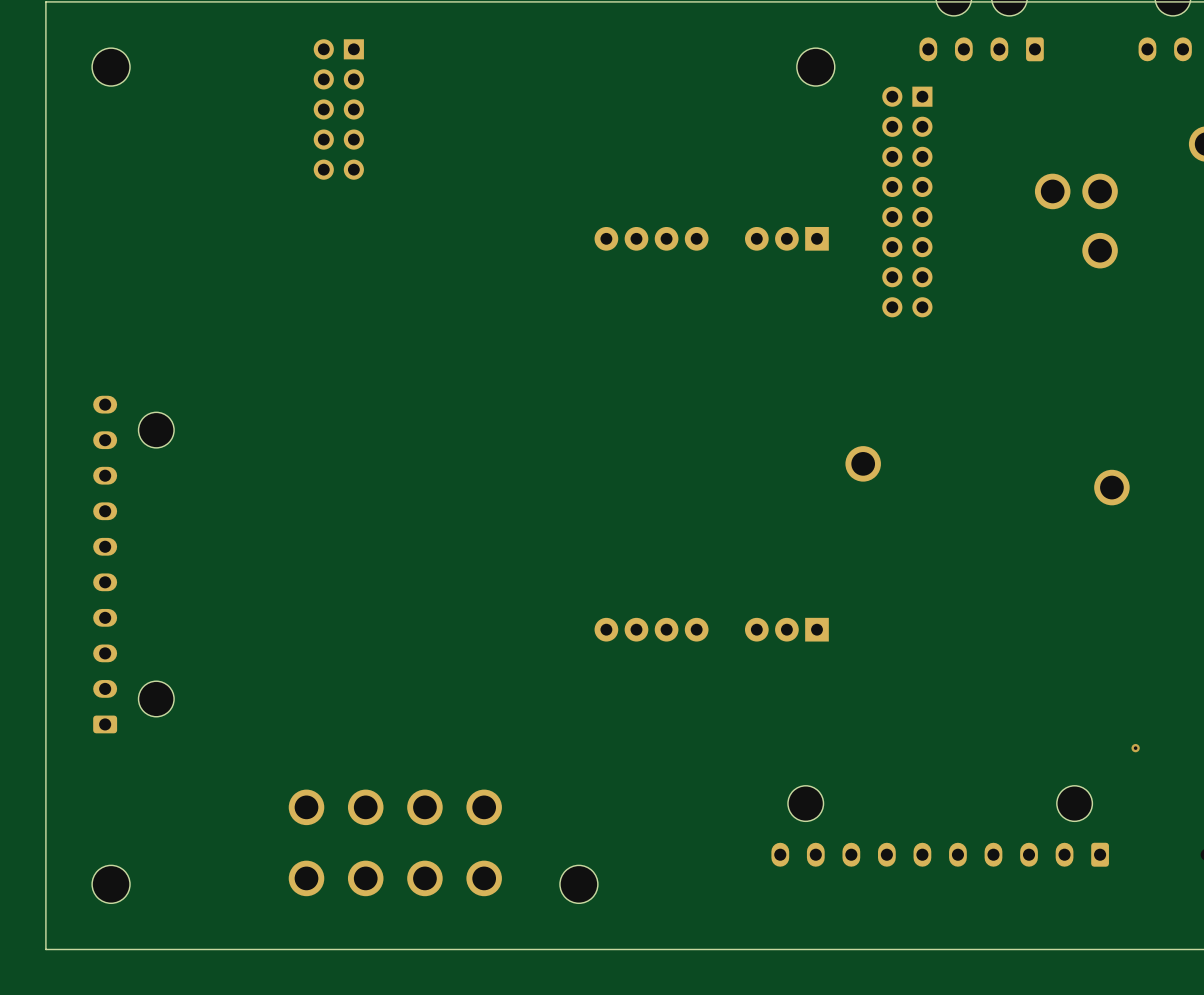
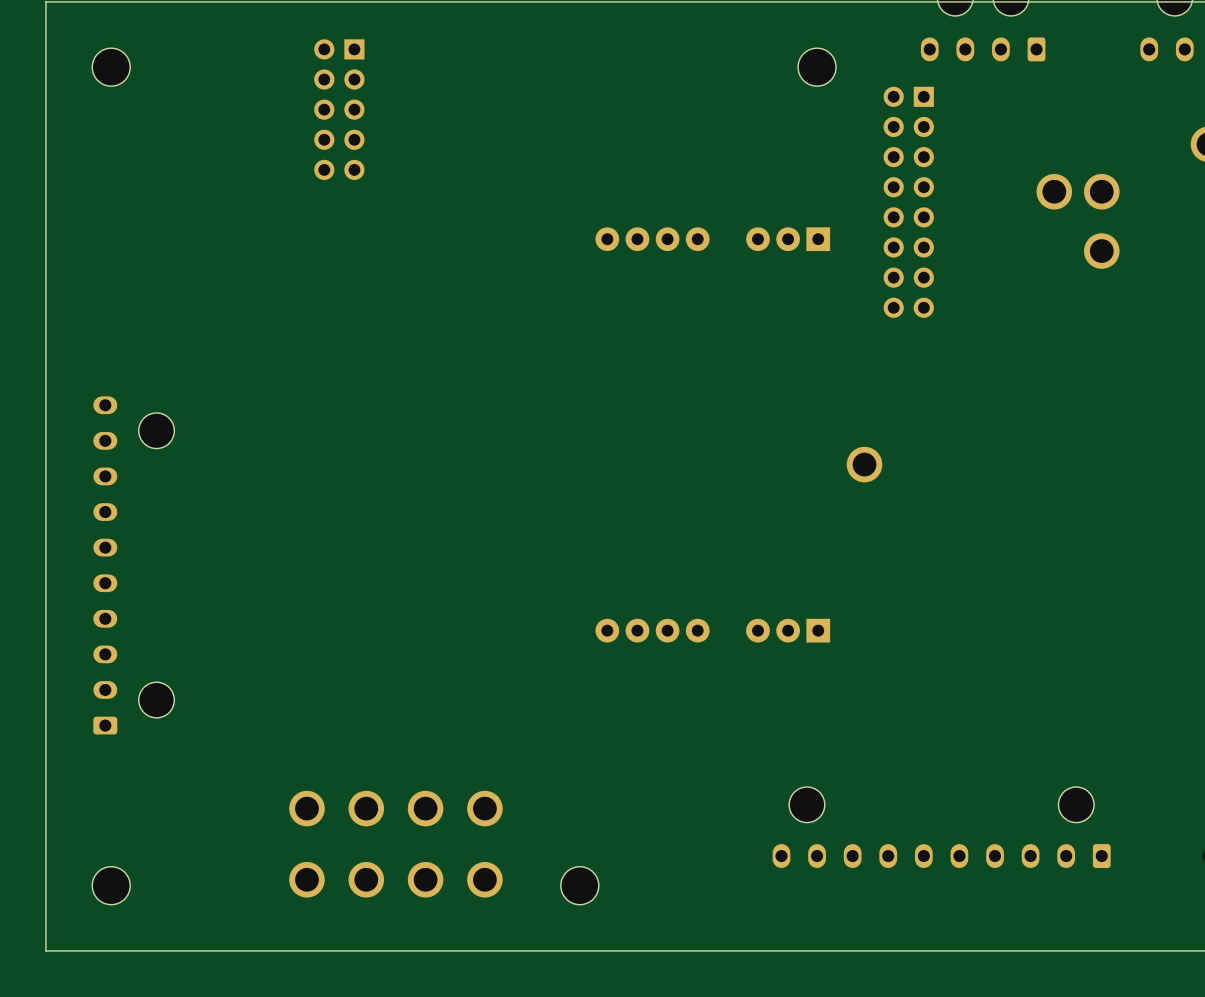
part: (1111, 487) -> none
via: (1135, 748) -> none

